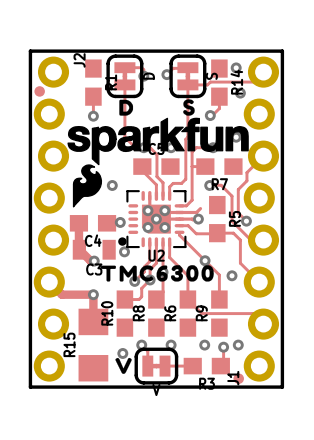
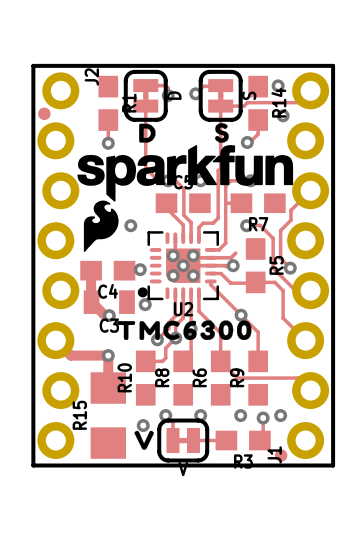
via: (236, 137) -> none
via: (232, 275) -> none

